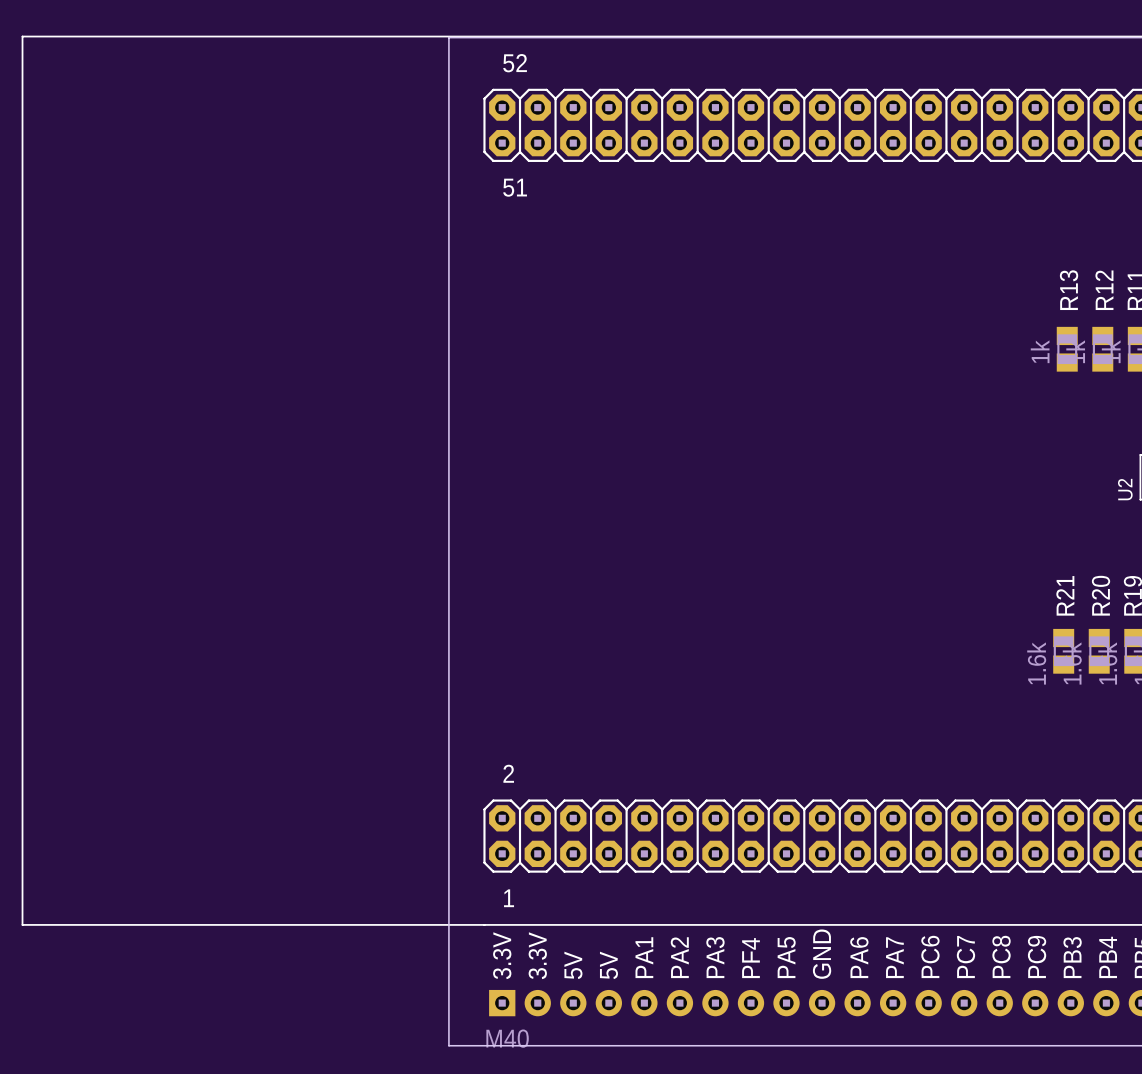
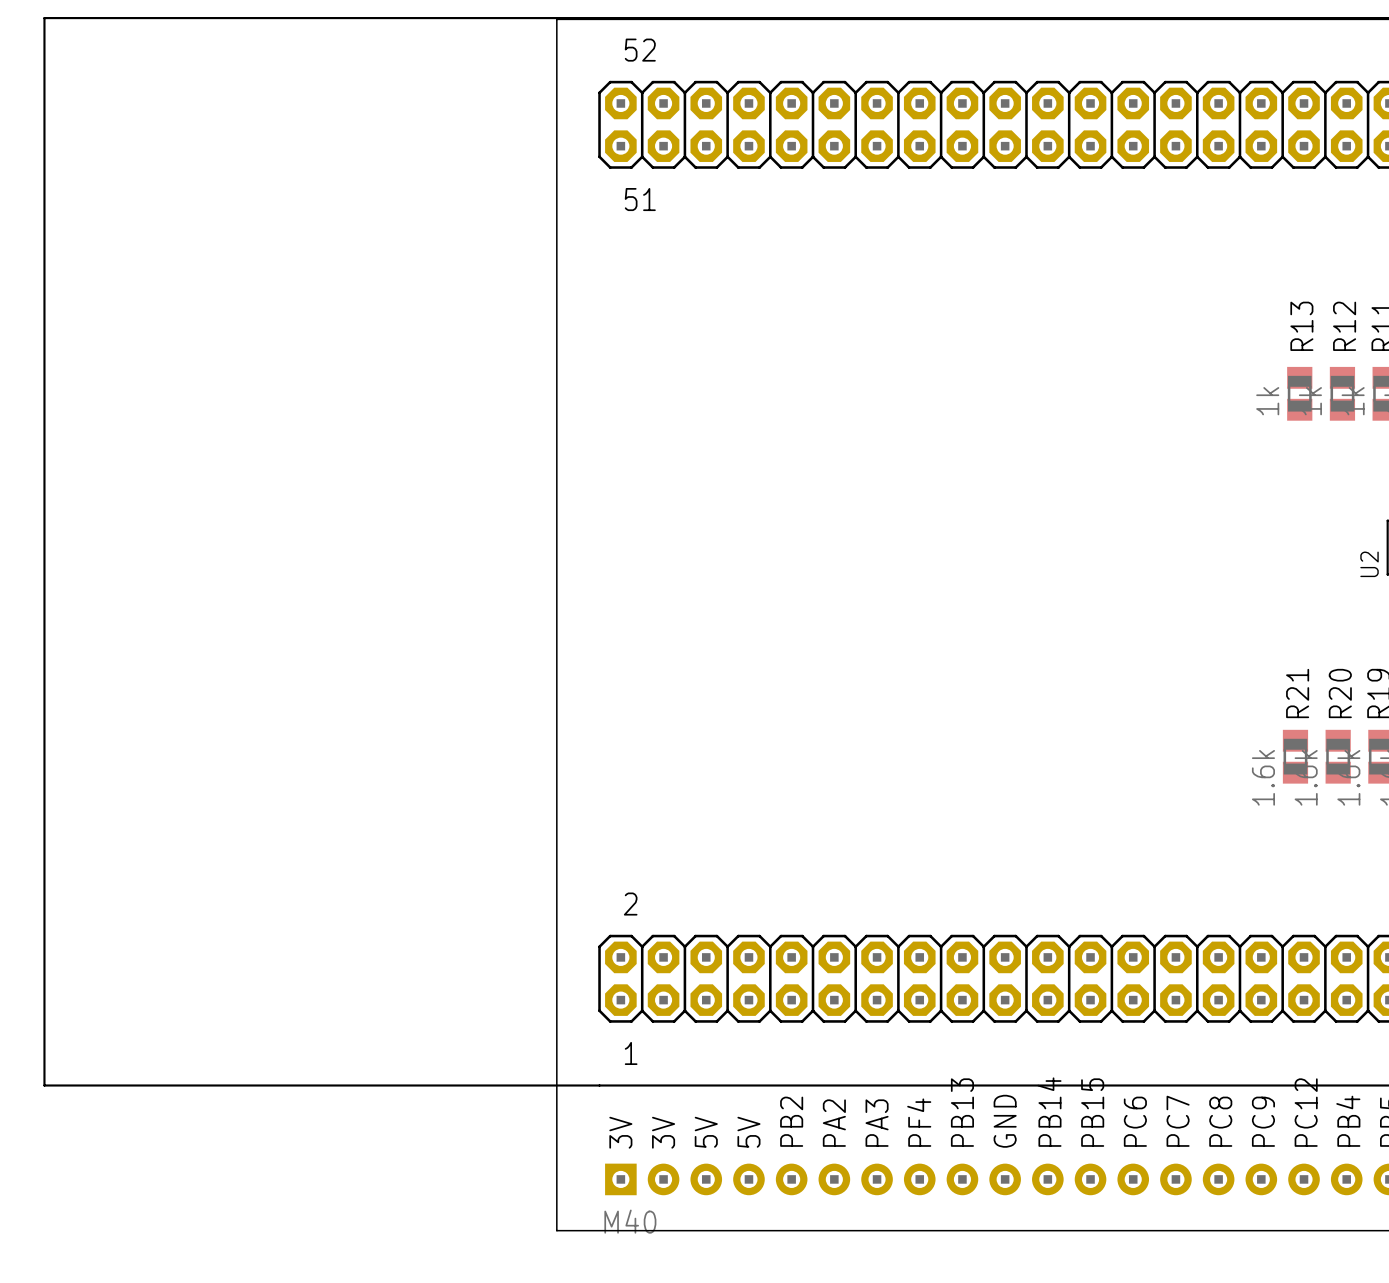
text: 3.3V (502, 955) -> 3V (620, 1132)
text: 3.3V (537, 955) -> 3V (663, 1132)
text: PA1 (644, 957) -> PB2 (791, 1121)
text: PA5 (786, 957) -> PB13 (962, 1112)
text: PA6 (859, 957) -> PB14 (1049, 1112)
text: PA7 (894, 957) -> PB15 (1092, 1112)
text: PB3 (1072, 957) -> PC12 (1306, 1112)

